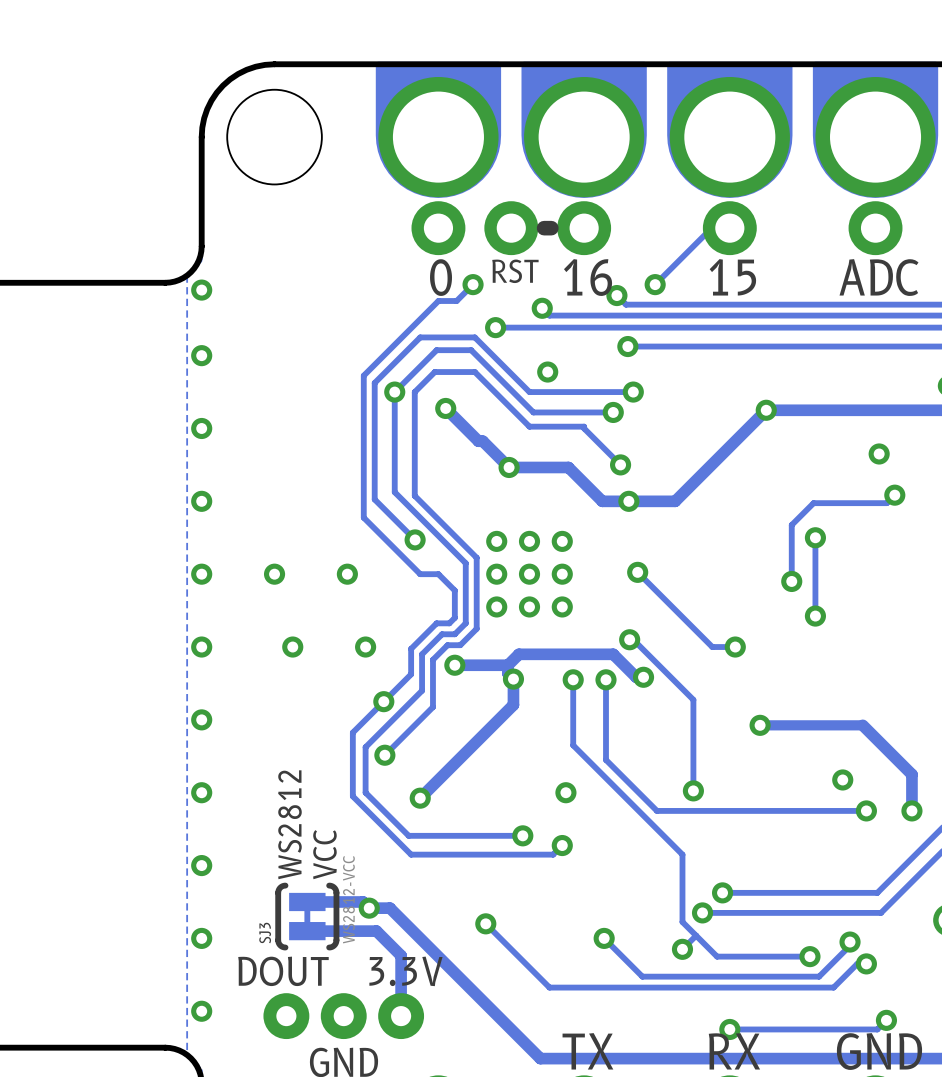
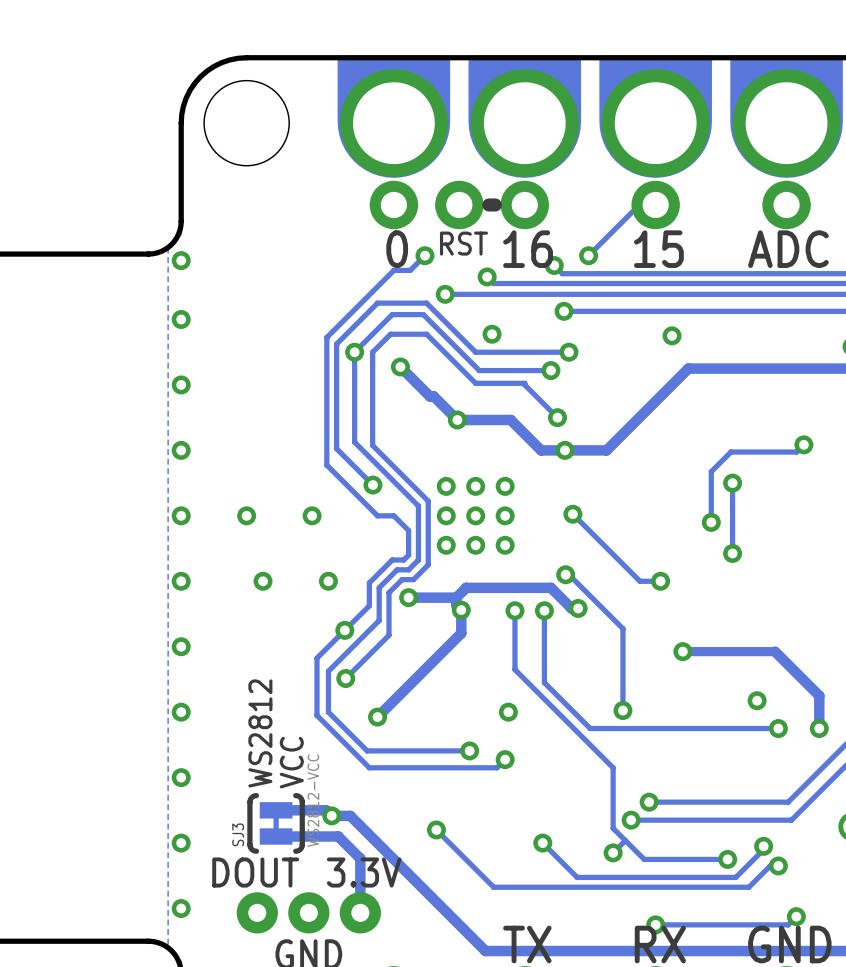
via position: (766, 410) -> (672, 335)
via: (879, 453) -> none

